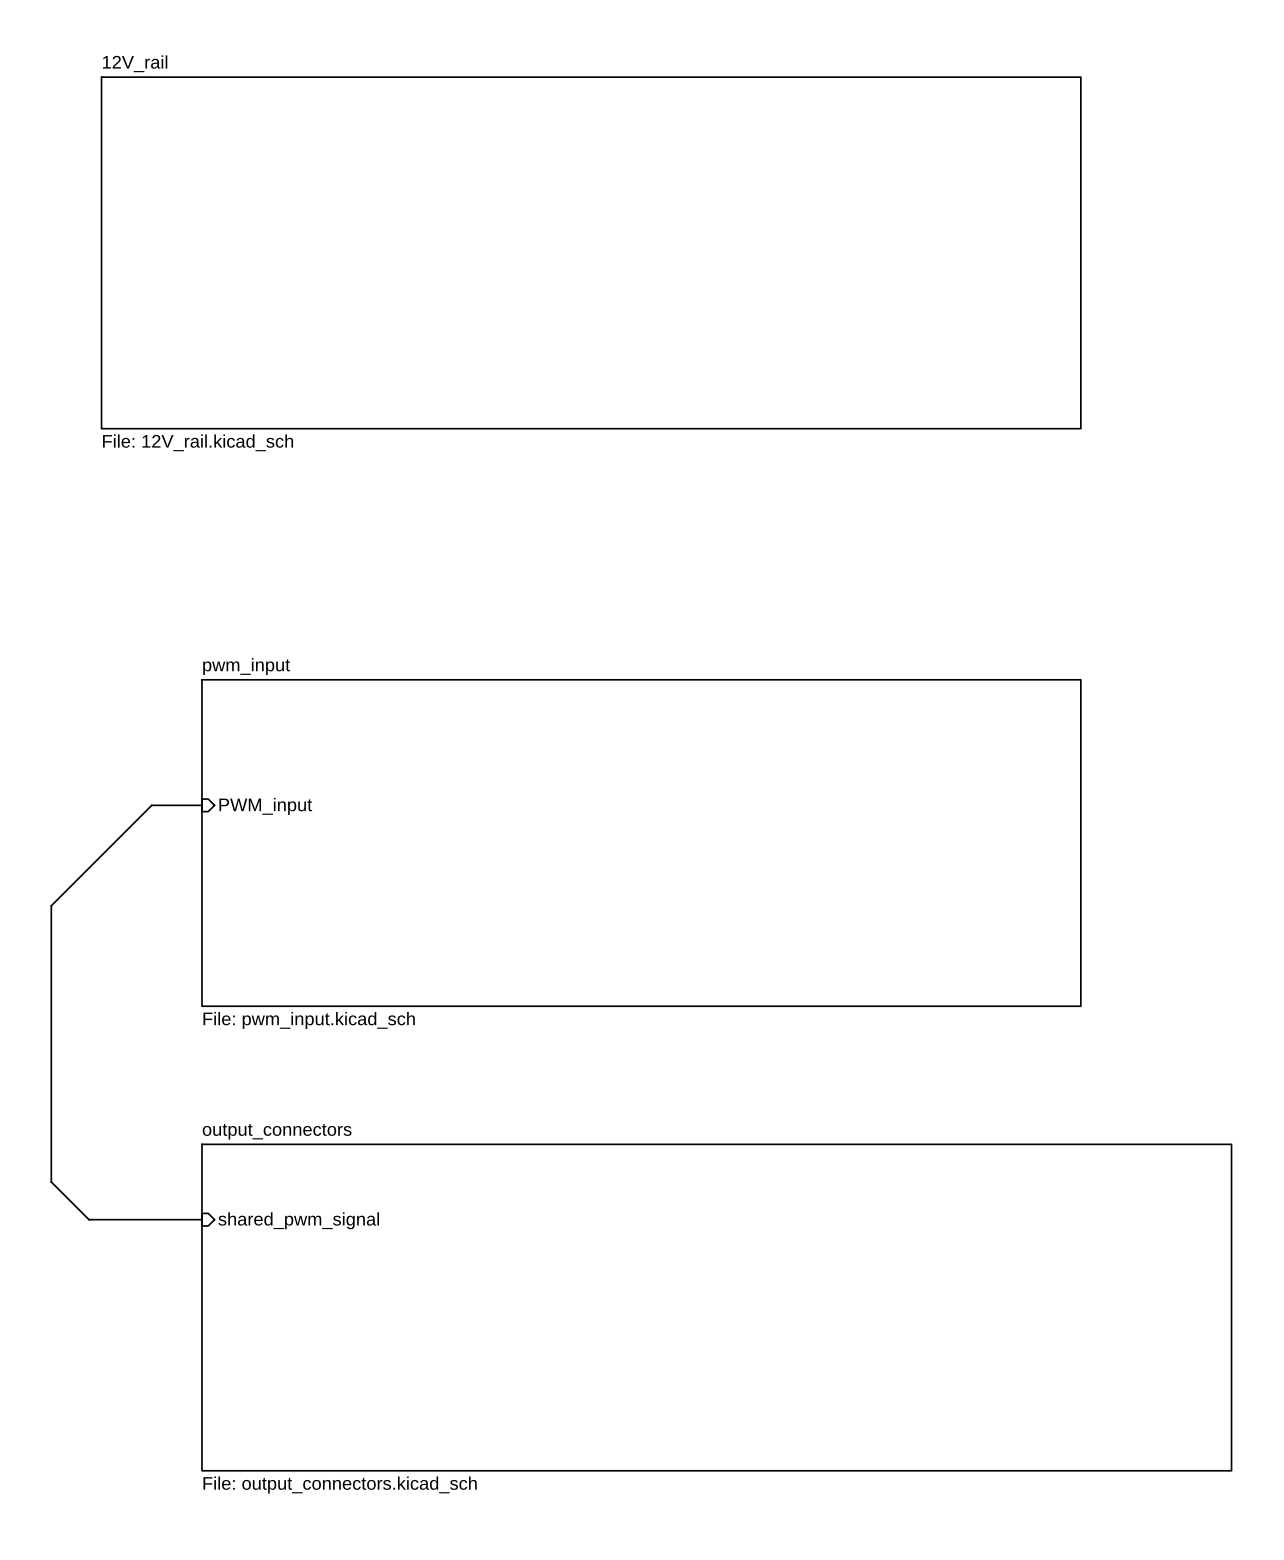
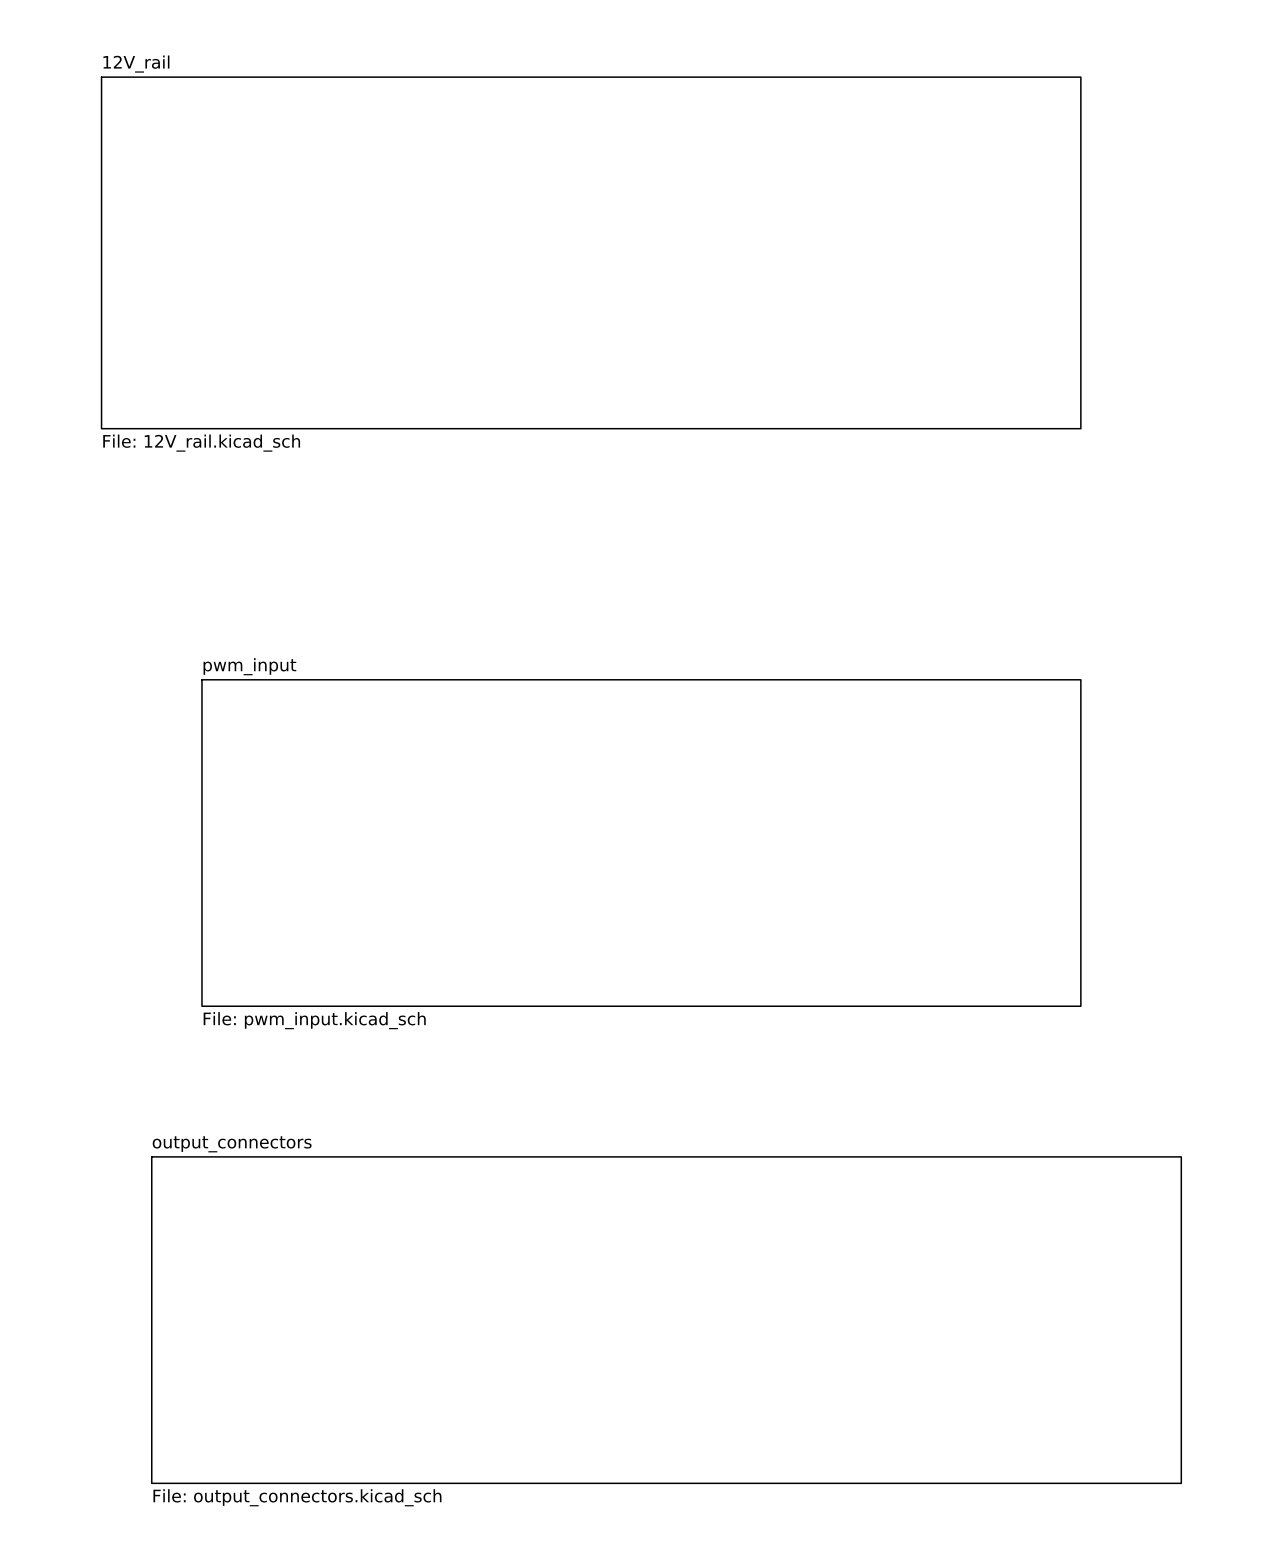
wire: (201, 805) (151, 805) (51, 905) (51, 1182) (88, 1219) (201, 1219) -> none
sheet pin: PWM_input (265, 806) -> none
sheet pin: shared_pwm_signal (298, 1220) -> none
sheet output_connectors position: (716, 1307) -> (666, 1320)

